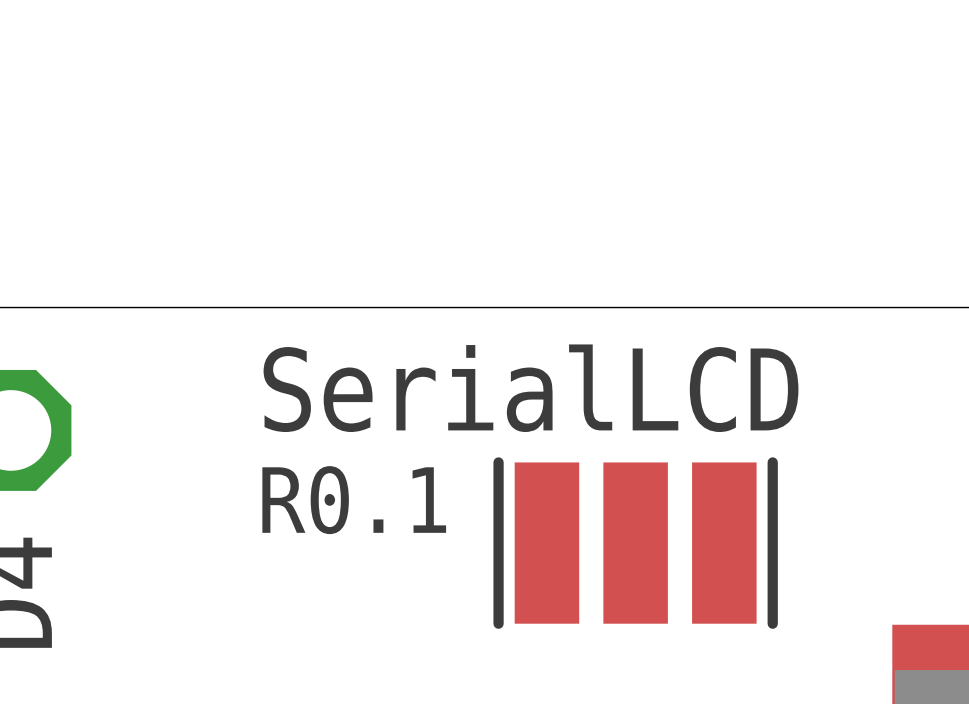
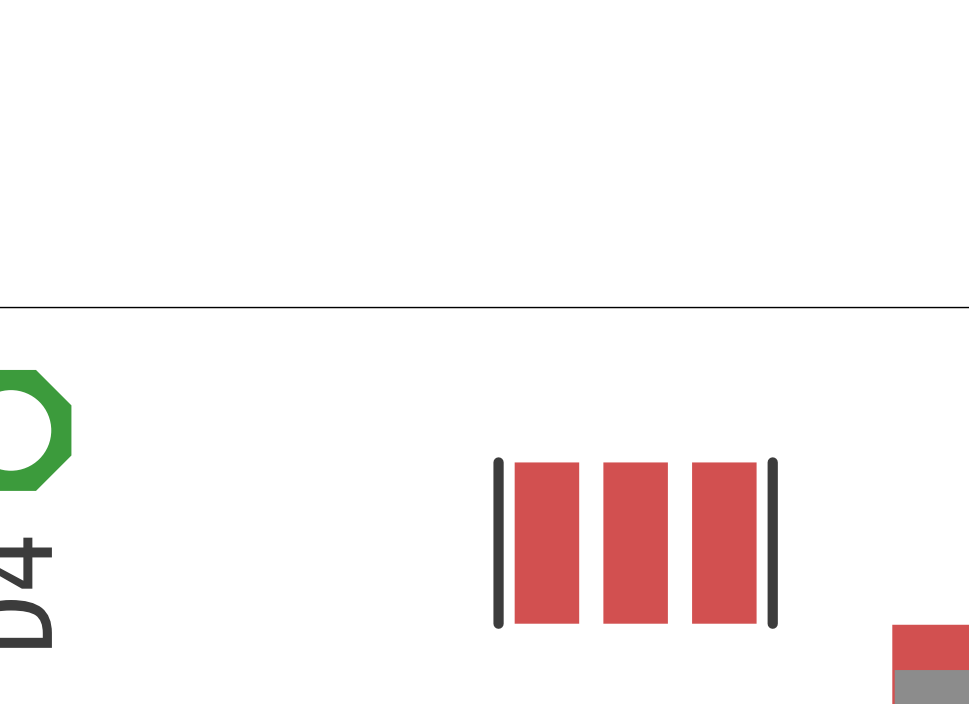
text: SerialLCD (531, 388) -> none
text: R0.1 (354, 500) -> none

